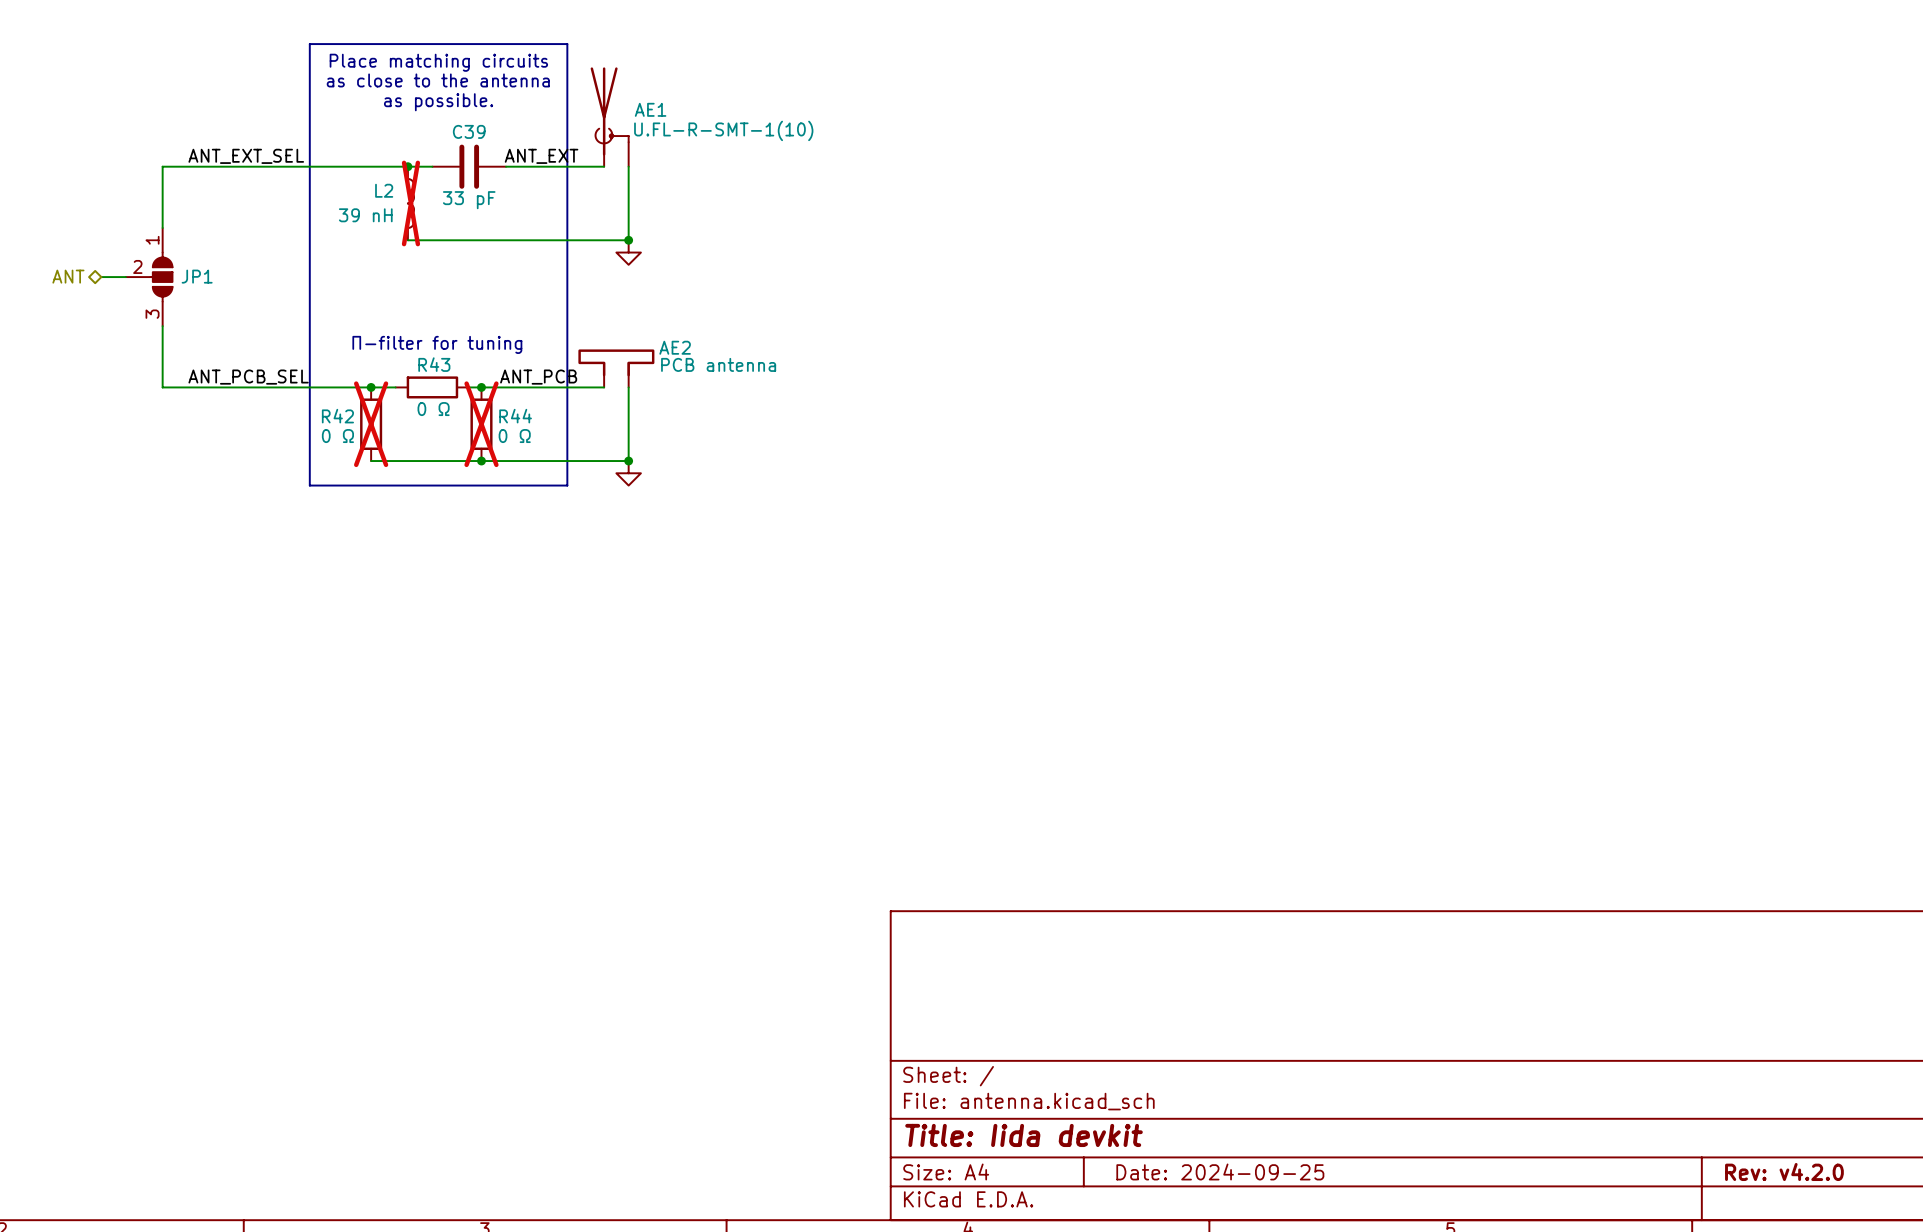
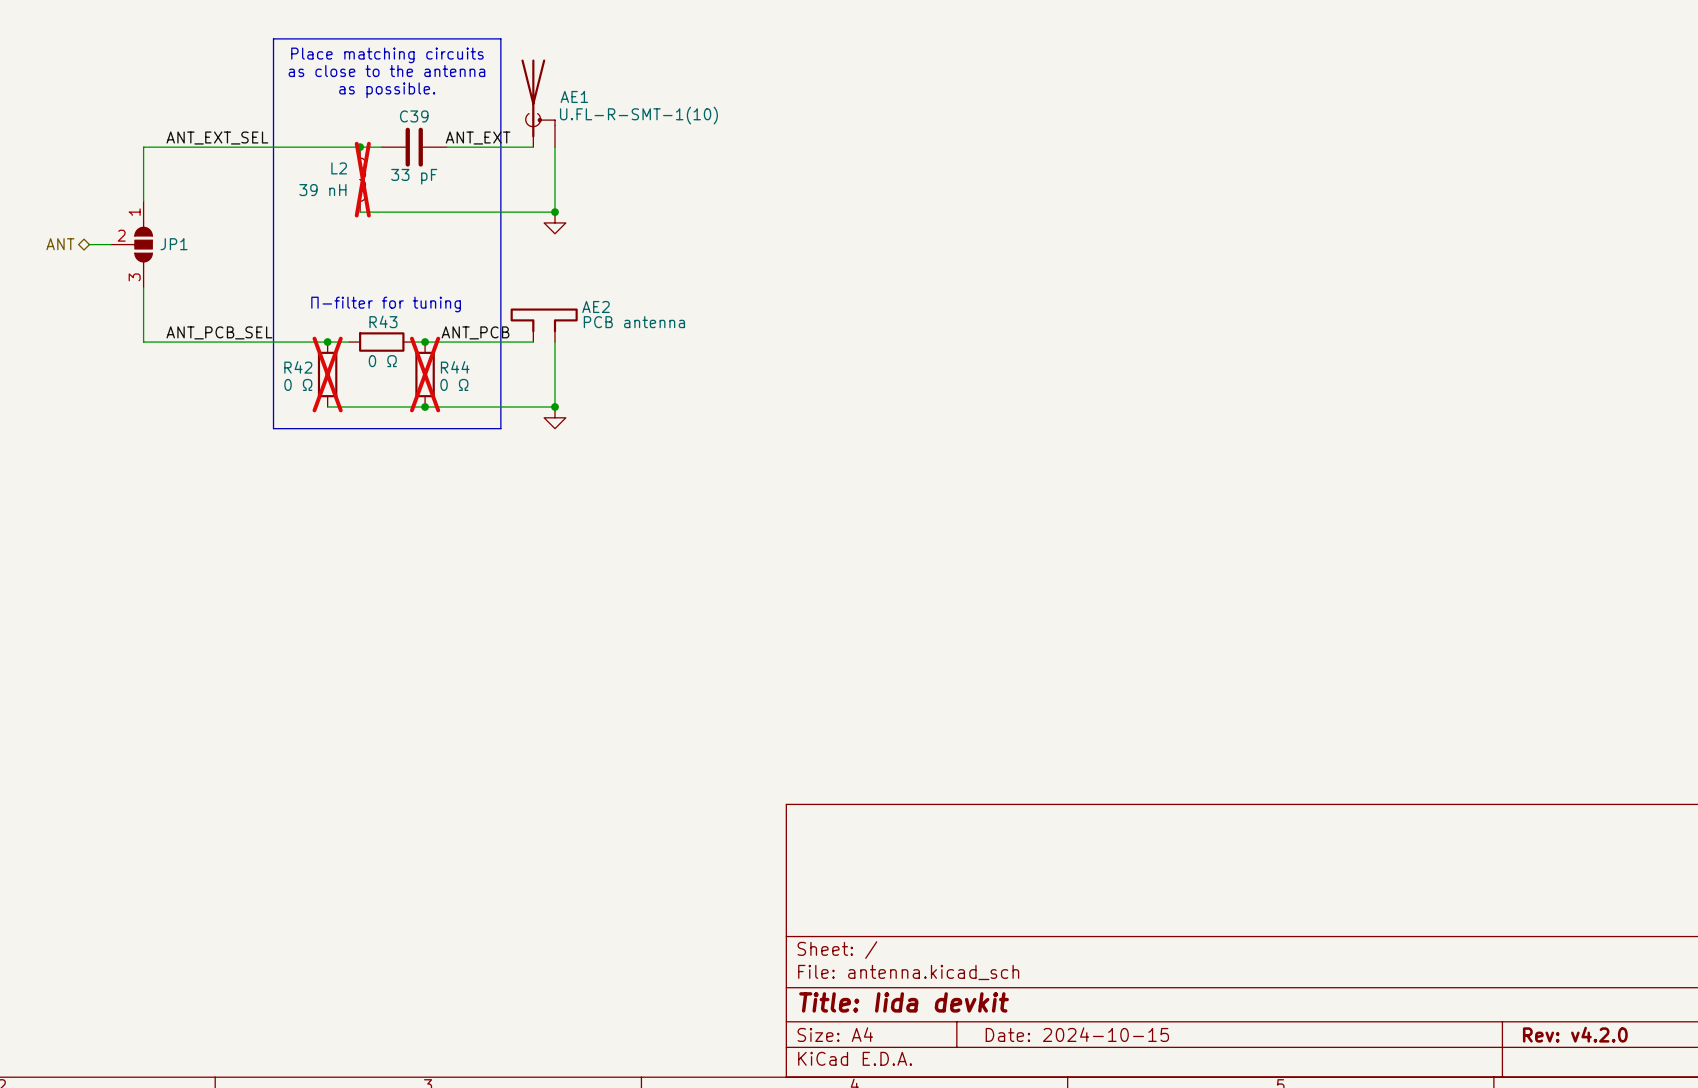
title block: Date: 2024-09-25 (1220, 1171) -> Date: 2024-10-15 (1077, 1034)

